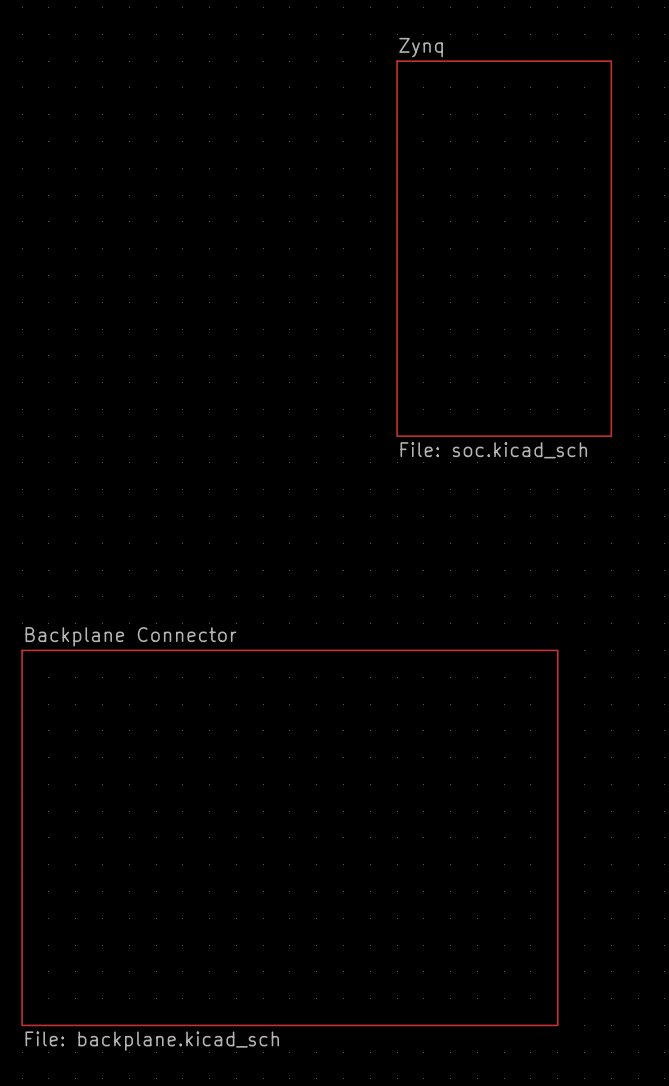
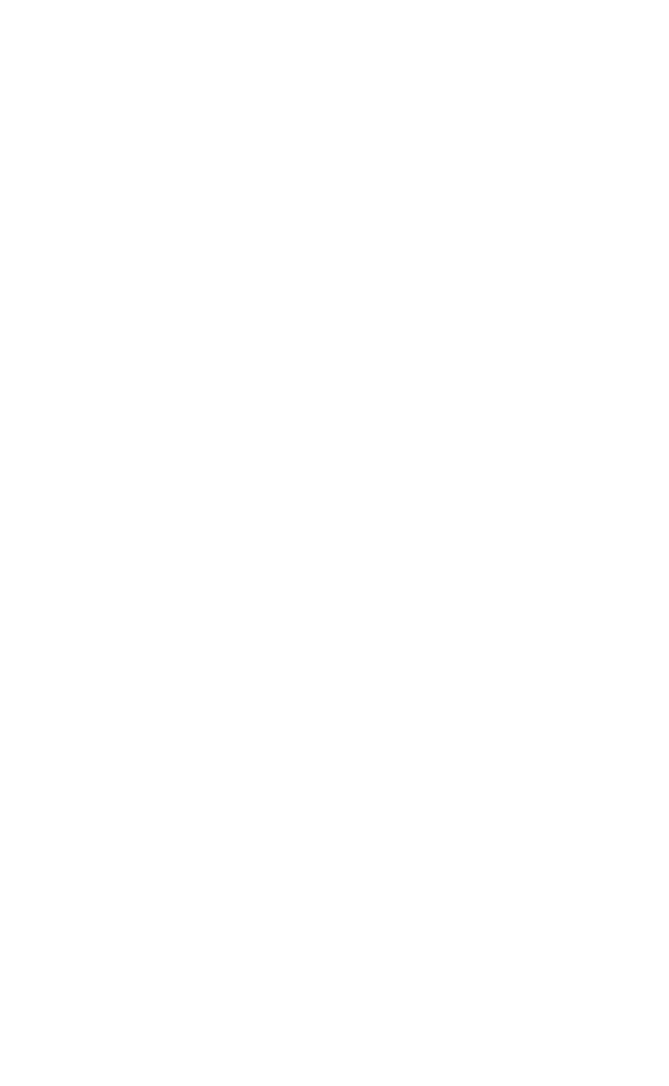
sheet Zynq: File: soc.kicad_sch (504, 248) -> none
sheet Backplane Connector: File: backplane.kicad_sch (289, 837) -> none

